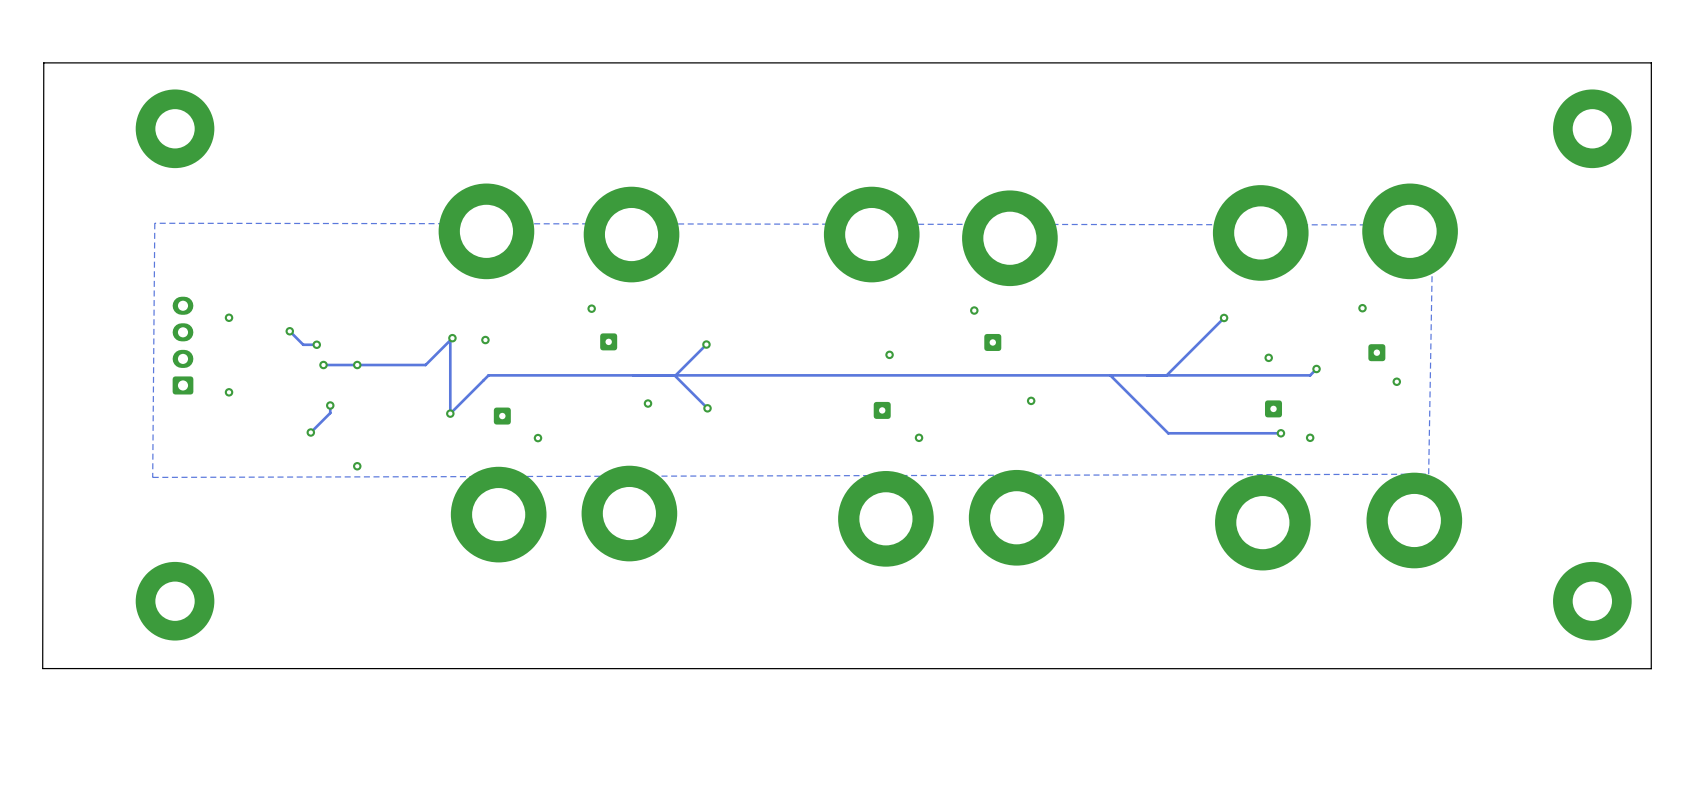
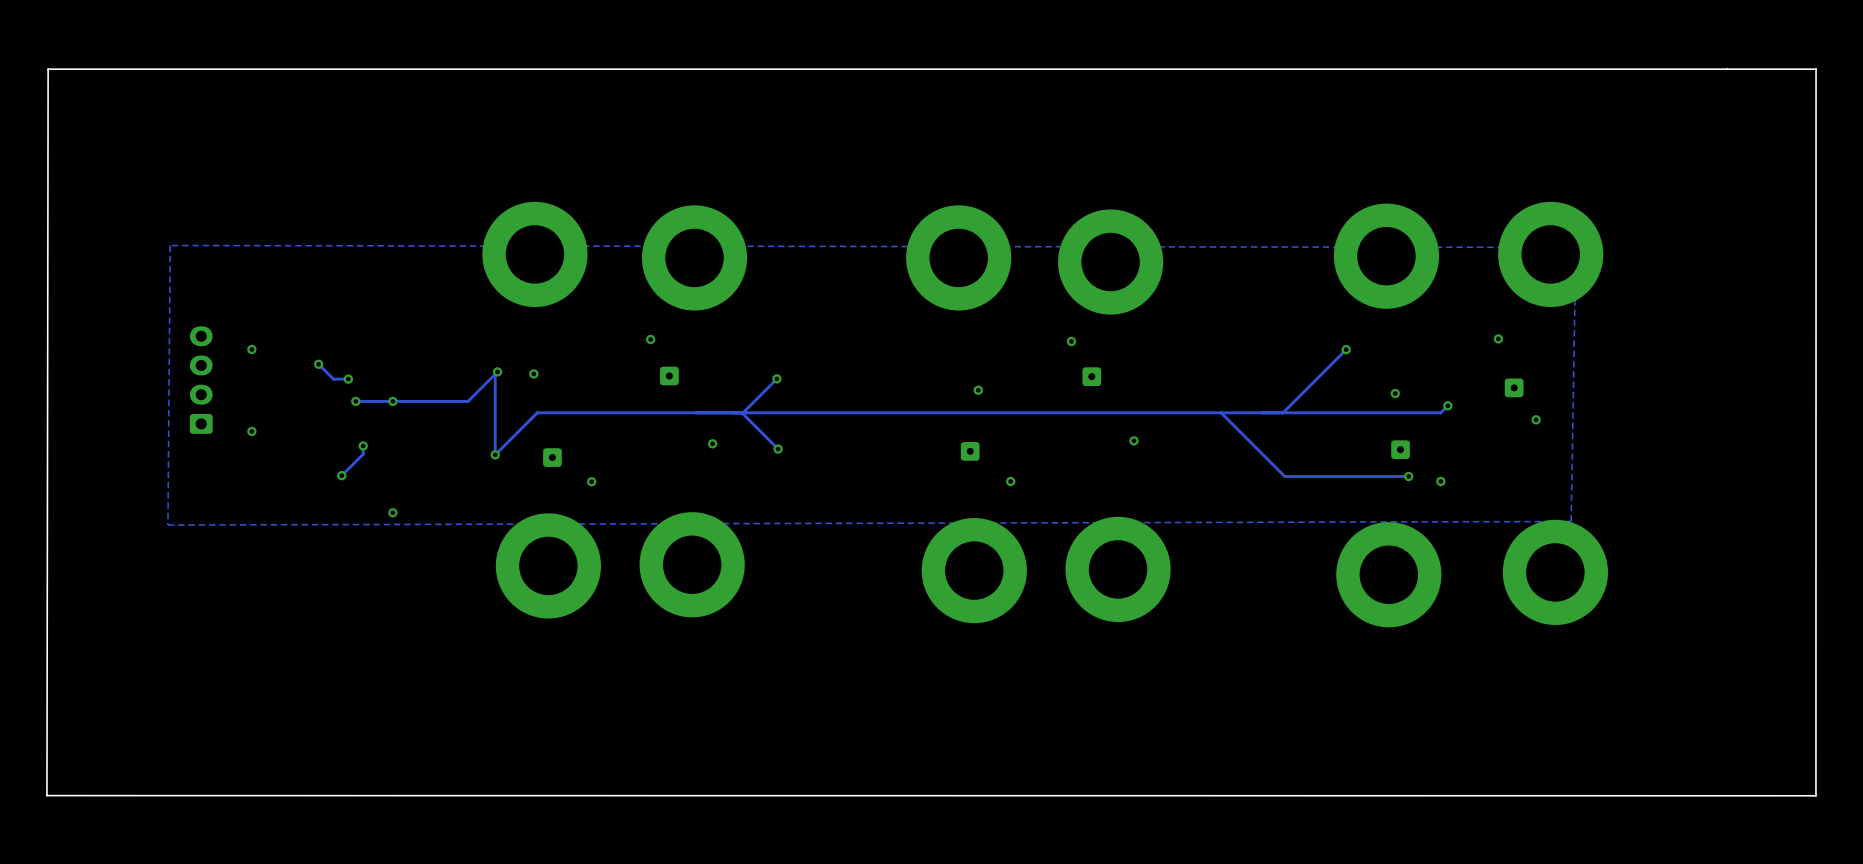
board edge: (43, 62) (42, 668) (1651, 668) -> (48, 69) (46, 795) (1815, 795) (1815, 735)
part: (175, 128) -> none
part: (1592, 128) -> none
part: (175, 601) -> none
part: (1592, 601) -> none

